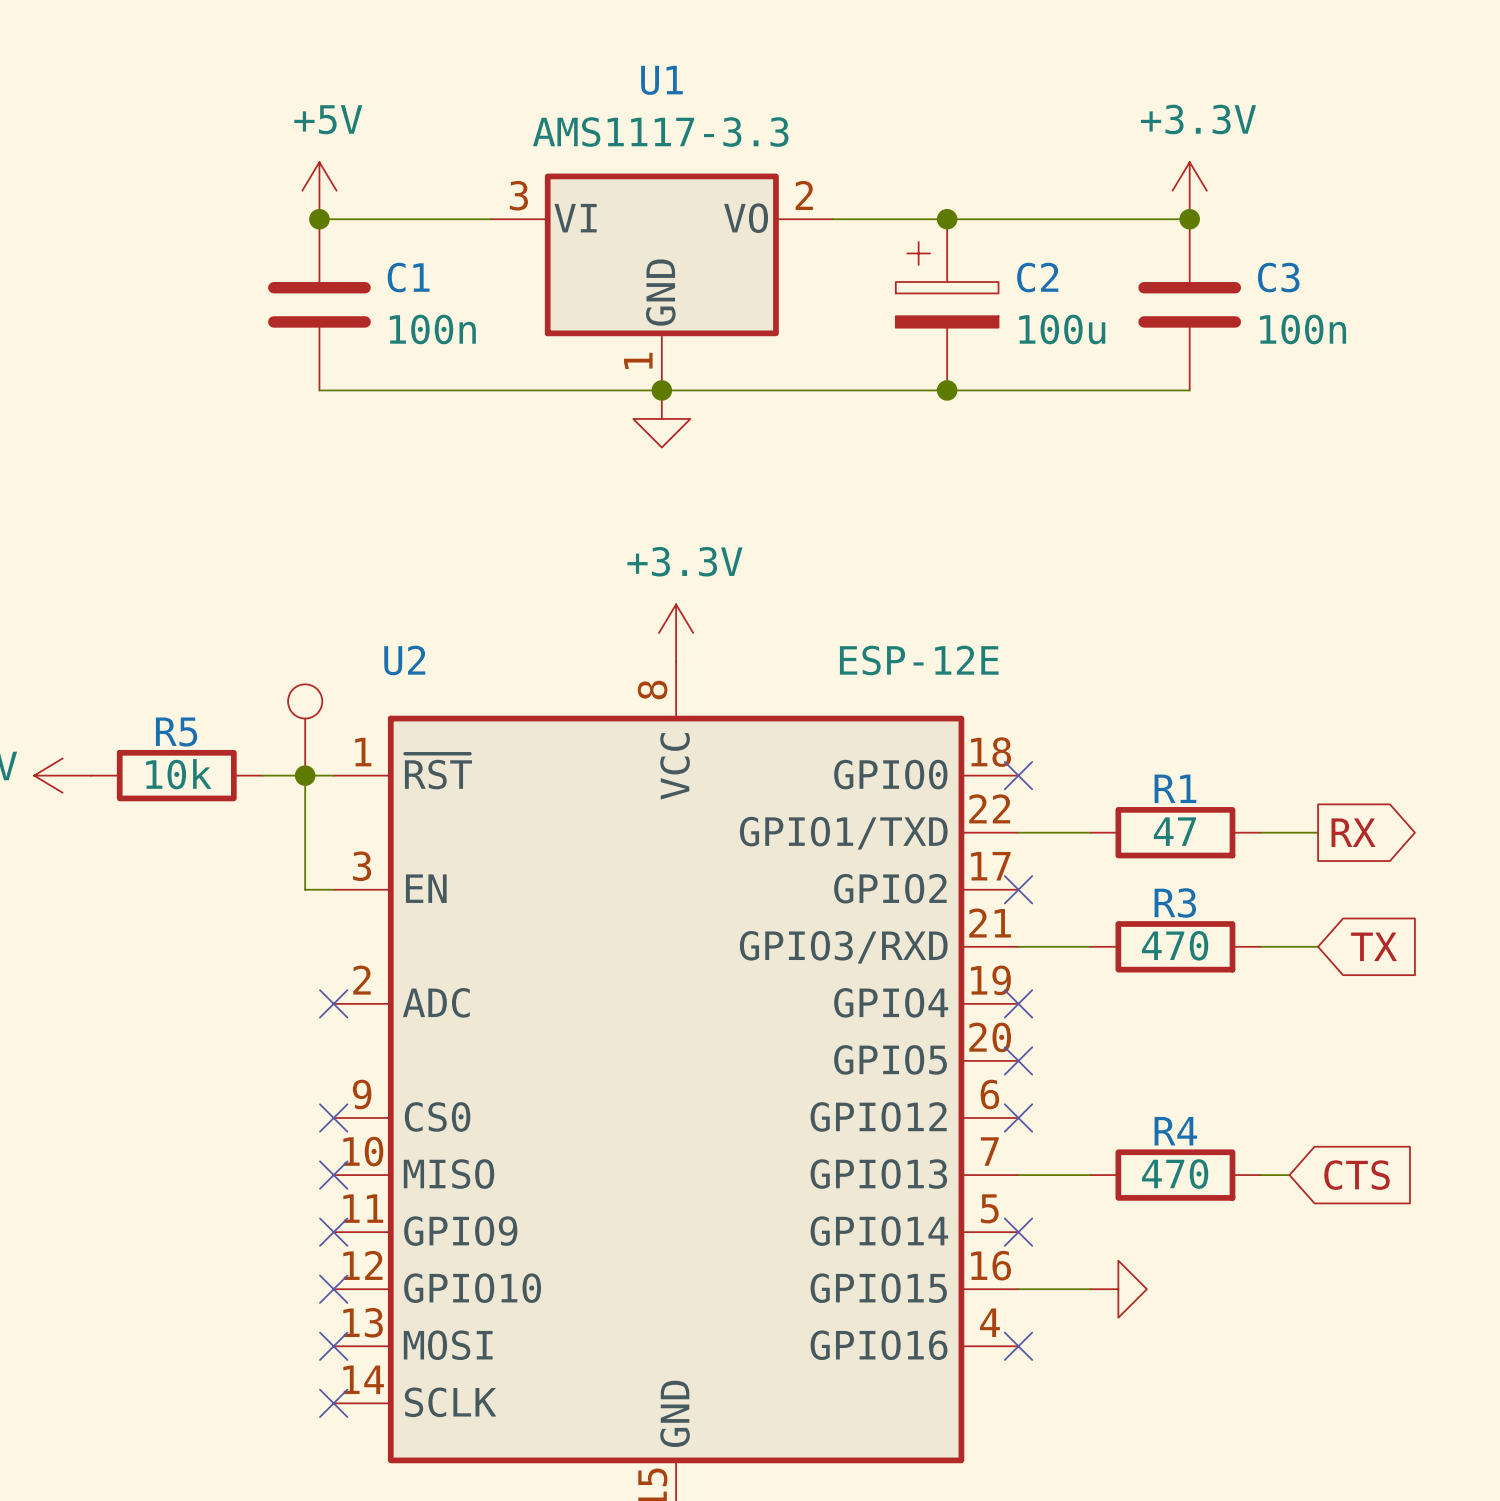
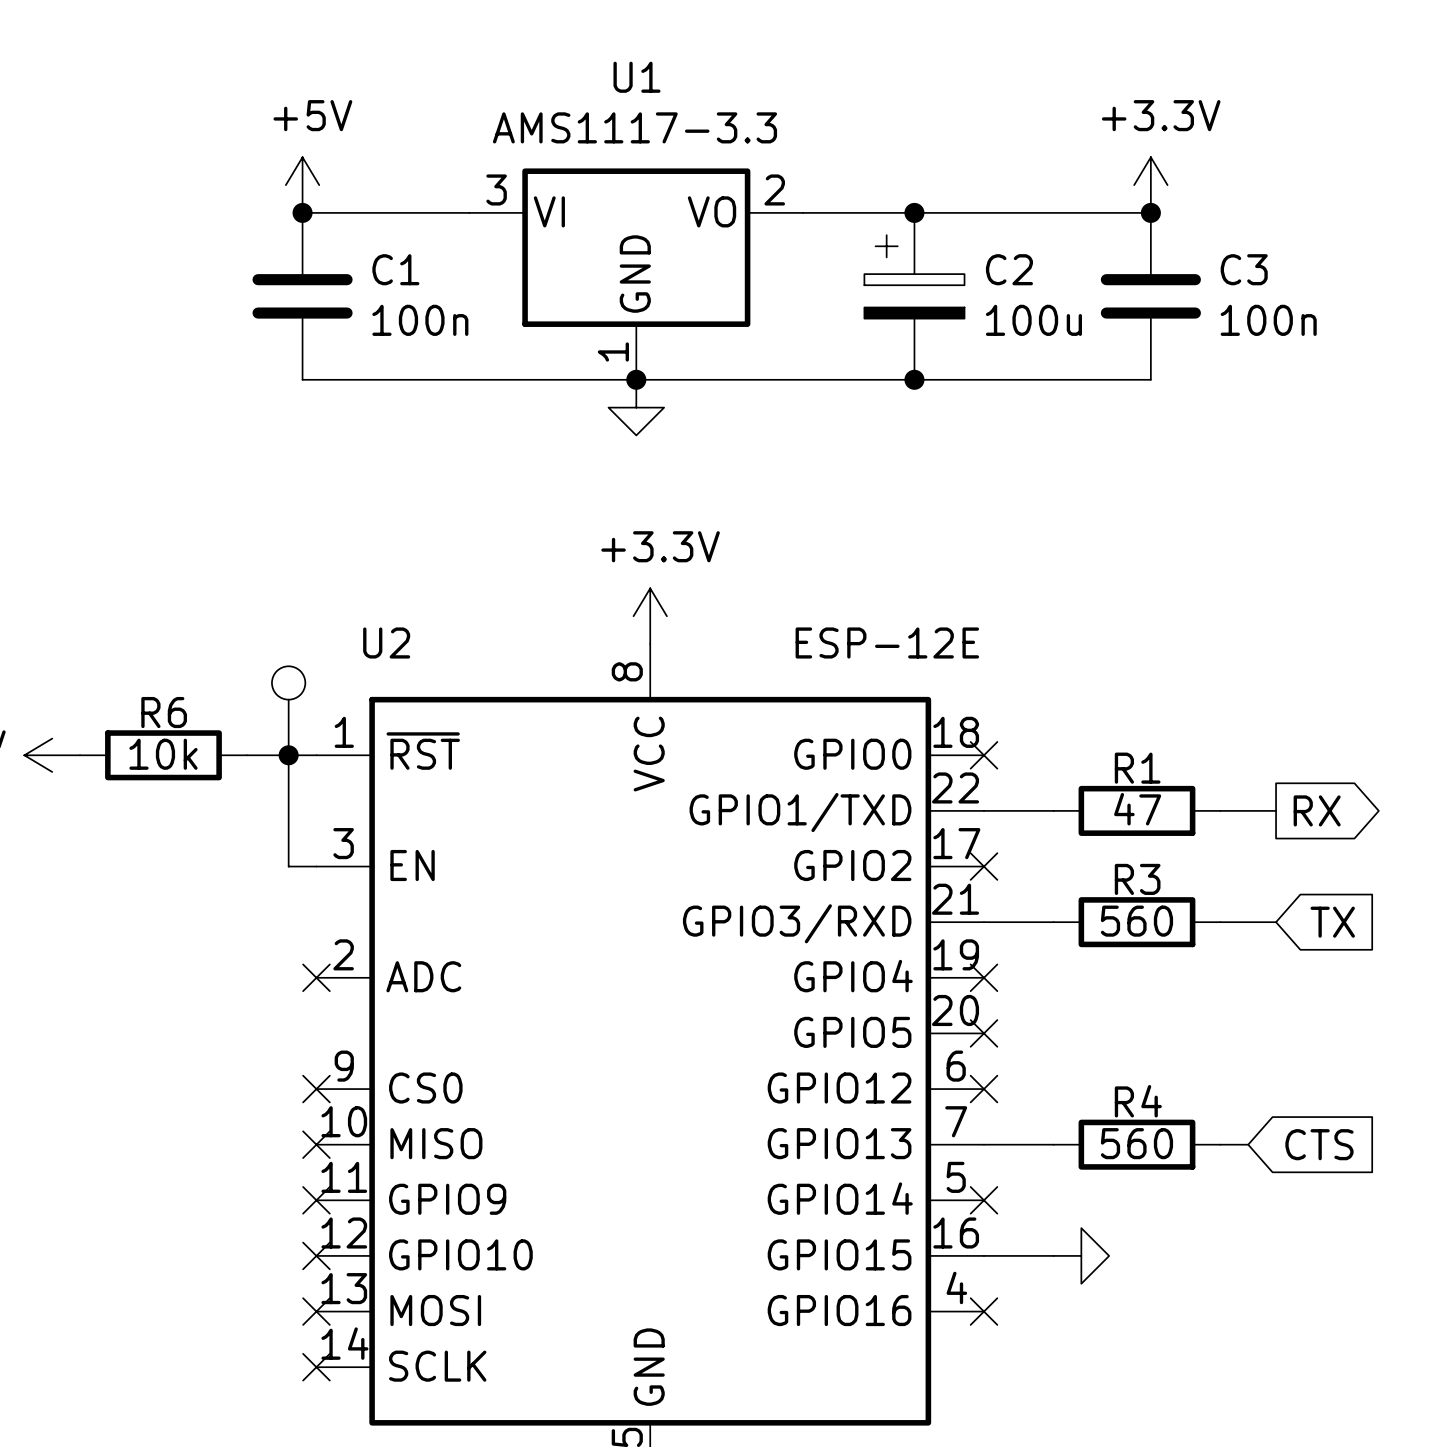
R5 name: R5 (176, 732) -> R6 (164, 712)
R3 value: 470 (1175, 945) -> 560 (1136, 921)
R4 value: 470 (1175, 1174) -> 560 (1136, 1143)

